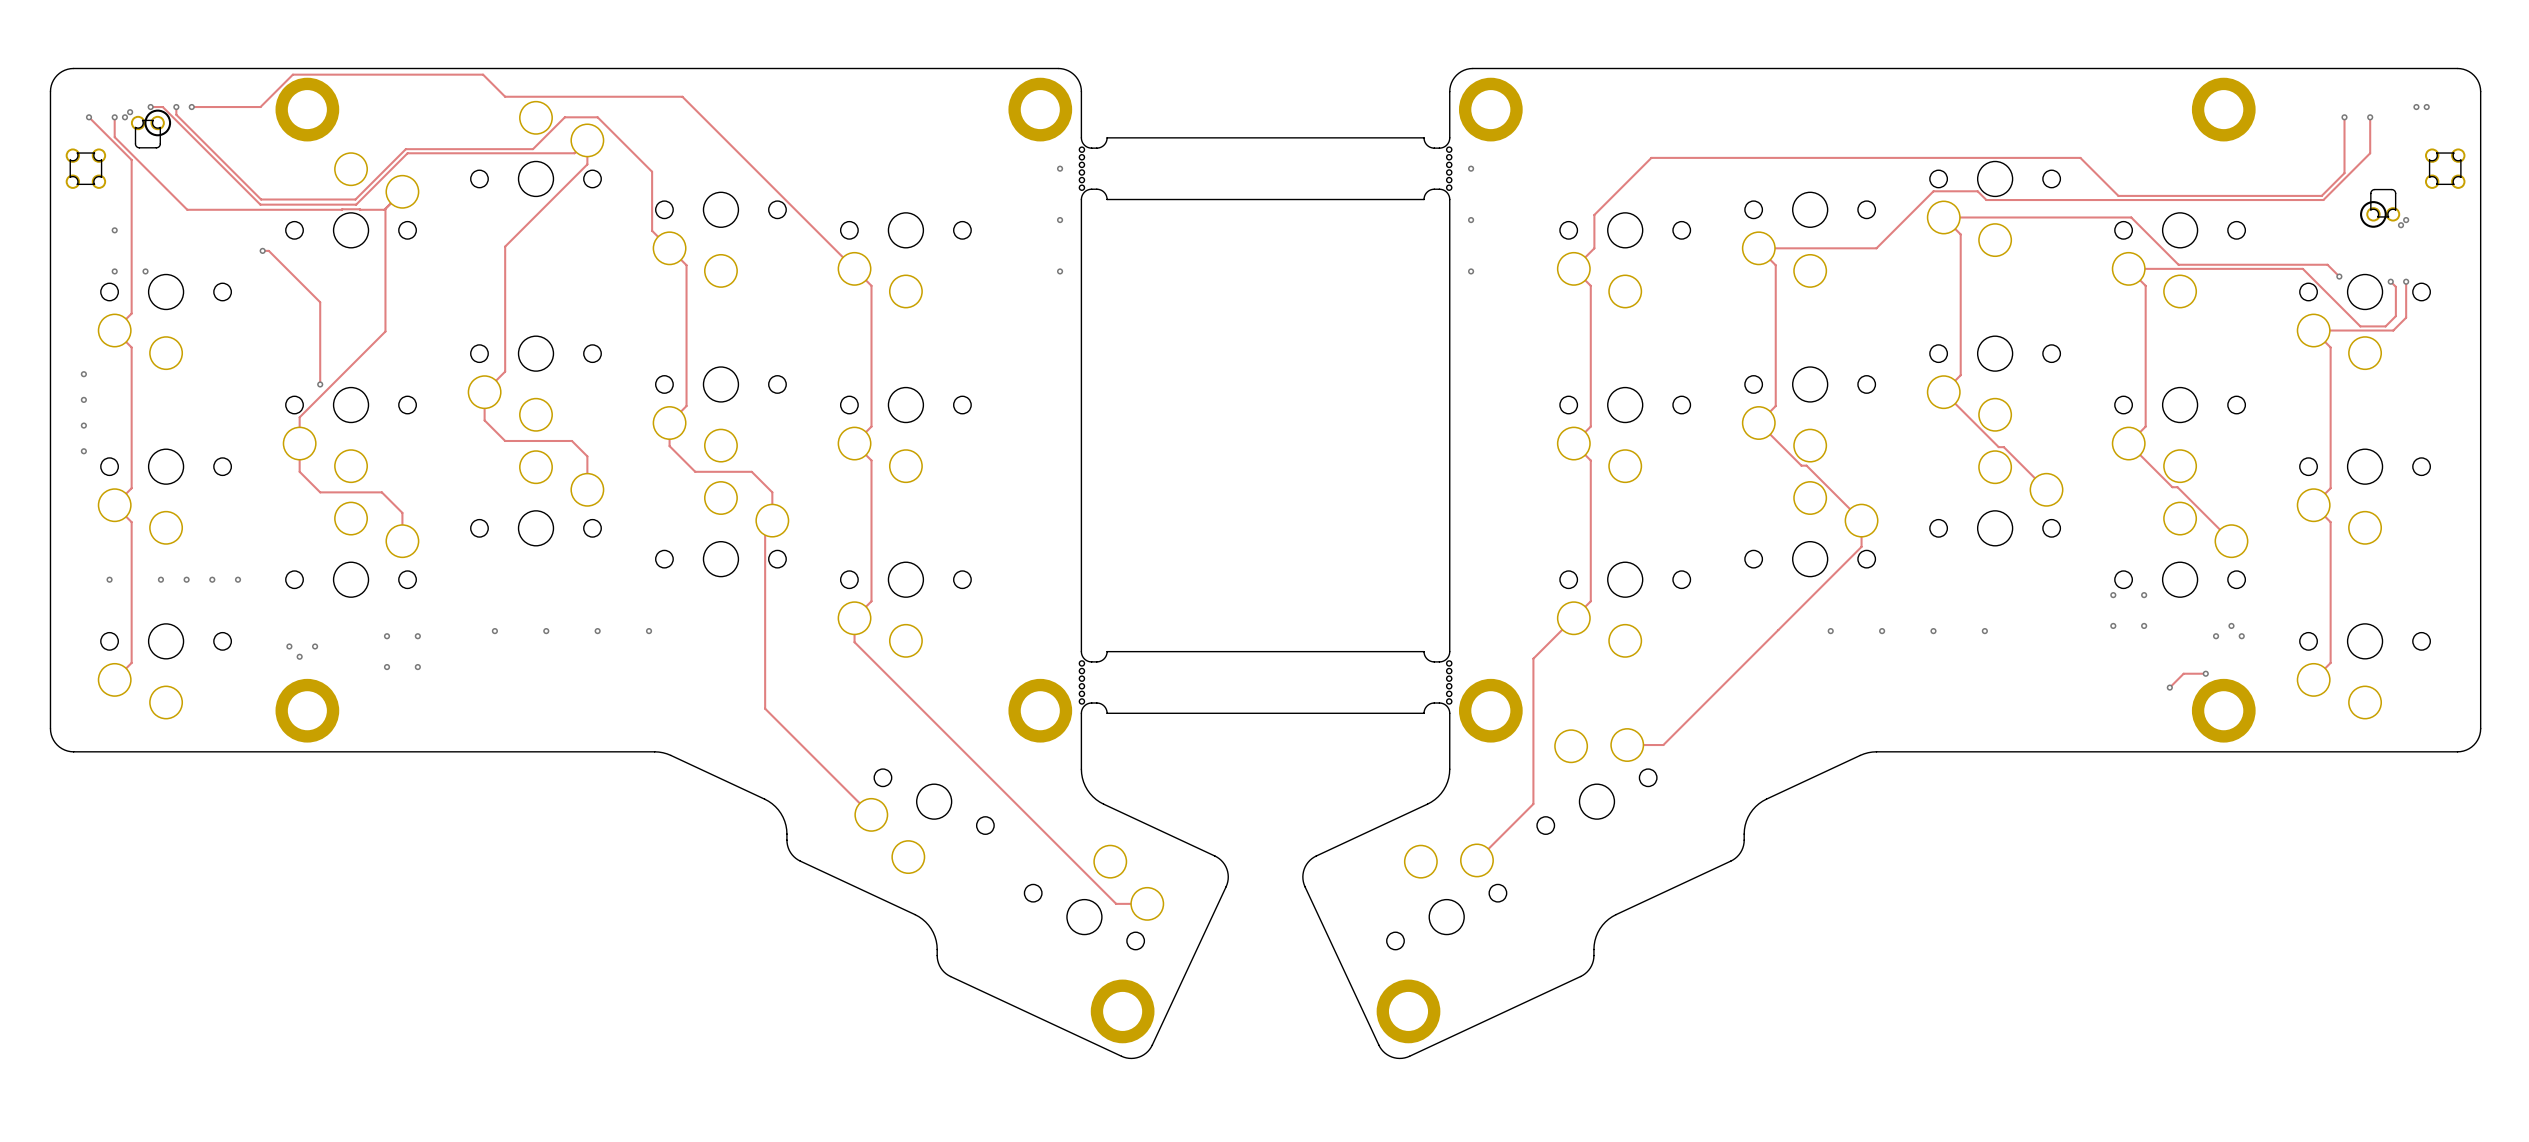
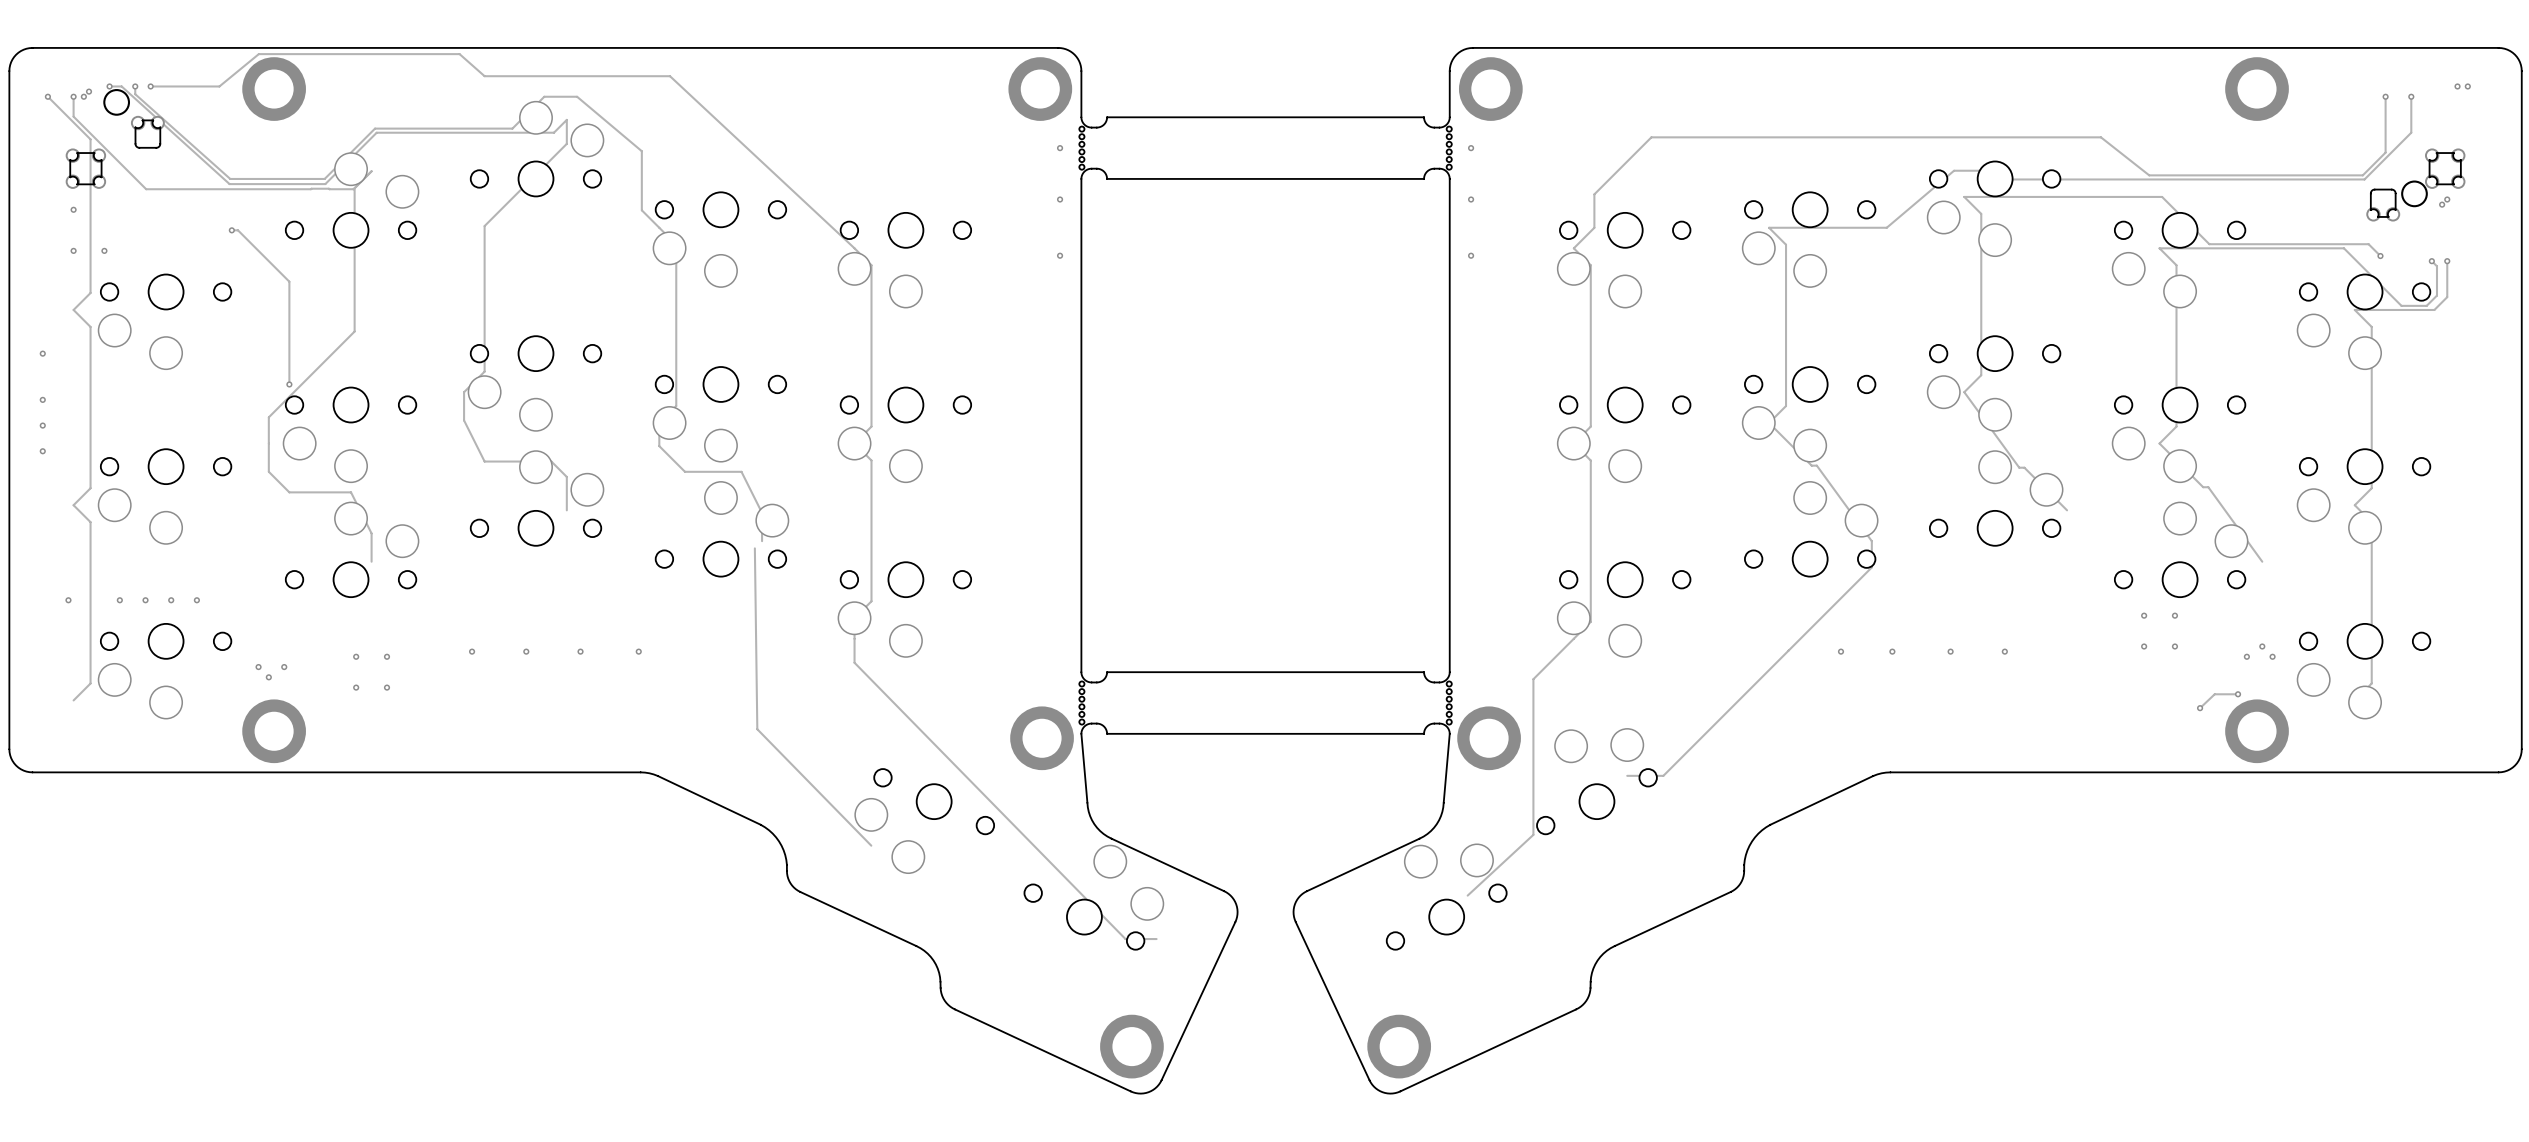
track: none -> (109, 86) (121, 86) (229, 184) (325, 184) (376, 132) (553, 132) (566, 119) (566, 143) (484, 226) (484, 371) (464, 392) (464, 420) (484, 461) (551, 461) (566, 476) (566, 510)
via: none -> (109, 86)
via: none -> (135, 86)
track: none -> (150, 86) (219, 86) (258, 54) (459, 54) (484, 76) (670, 76) (871, 265) (871, 285)
via: none -> (150, 86)
via: none -> (2457, 86)
via: none -> (2467, 86)
via: none -> (89, 91)
board edge: (1081, 91) (1079, 81) (1074, 75) (1068, 70) (1058, 68) (73, 68) (62, 71) (53, 80) (50, 91) (50, 728) (52, 737) (57, 745) (64, 750) (73, 751) (654, 751) (667, 753) (772, 803) (783, 817) (788, 847) (797, 859) (922, 919) (933, 932) (938, 963) (948, 975) (1121, 1056) (1134, 1058) (1145, 1053) (1152, 1045) (1226, 886) (1228, 874) (1224, 864) (1217, 857) (1103, 804) (1092, 796) (1085, 786) (1081, 773) (1081, 713) -> (1081, 91) (1081, 68) (1079, 61) (1070, 51) (1058, 47) (32, 47) (23, 49) (16, 54) (11, 62) (9, 71) (9, 749) (12, 760) (20, 769) (32, 772) (640, 772) (653, 774) (769, 830) (781, 845) (786, 859) (788, 878) (797, 890) (924, 950) (935, 964) (940, 977) (942, 995) (952, 1008) (1130, 1091) (1143, 1093) (1153, 1089) (1161, 1080) (1235, 921) (1237, 909) (1233, 899) (1226, 892) (1111, 838) (1097, 827) (1087, 807) (1081, 733)
board edge: (1449, 91) (1451, 82) (1456, 75) (1464, 70) (1472, 68) (2457, 68) (2469, 71) (2477, 80) (2480, 91) (2480, 728) (2478, 737) (2473, 745) (2466, 750) (2457, 751) (1876, 751) (1864, 753) (1759, 803) (1748, 817) (1742, 847) (1733, 859) (1608, 919) (1597, 932) (1592, 963) (1582, 975) (1409, 1056) (1396, 1058) (1387, 1054) (1378, 1045) (1305, 886) (1303, 874) (1306, 864) (1313, 857) (1427, 804) (1438, 796) (1445, 786) (1449, 773) (1449, 713) -> (1449, 91) (1449, 68) (1452, 59) (1461, 51) (1472, 47) (2498, 47) (2507, 49) (2514, 54) (2520, 62) (2521, 71) (2521, 749) (2518, 760) (2510, 769) (2498, 772) (1890, 772) (1877, 774) (1762, 830) (1749, 845) (1744, 859) (1742, 878) (1733, 890) (1606, 950) (1595, 964) (1591, 977) (1588, 995) (1578, 1008) (1400, 1091) (1387, 1093) (1375, 1088) (1369, 1080) (1295, 921) (1293, 909) (1297, 899) (1304, 892) (1419, 838) (1434, 827) (1443, 807) (1449, 733)
track: none -> (47, 96) (90, 139) (90, 293) (73, 309) (90, 326) (90, 488) (73, 505) (90, 522) (90, 683) (73, 700)
via: none -> (47, 96)
track: none -> (73, 96) (73, 116) (146, 189) (353, 189) (371, 171)
via: none -> (73, 96)
via: none -> (83, 96)
track: (544, 96) (505, 96) (483, 74) (292, 74) (260, 107) (191, 107) -> (544, 96) (512, 128) (375, 128) (324, 178) (230, 178) (135, 94) (135, 86)
track: (577, 96) (682, 96) (871, 285) -> (577, 96) (641, 151) (641, 210) (676, 244) (676, 406) (659, 423) (659, 446) (684, 471) (695, 471)
via: none -> (2385, 96)
track: none -> (2411, 96) (2411, 132) (2364, 179) (2006, 179) (1998, 170) (1954, 170) (1886, 227) (1769, 227) (1786, 244) (1786, 406) (1769, 423) (1811, 465) (1816, 465) (1871, 541) (1871, 567) (1663, 775) (1627, 775)
via: none -> (2411, 96)
track: (150, 107) (162, 107) (260, 204) (356, 204) (407, 153) (574, 153) (587, 140) (587, 164) (505, 246) (505, 371) (484, 392) (484, 420) (505, 440) (571, 440) (587, 456) (587, 489) -> none
via: (150, 107) -> none
track: (176, 107) (176, 114) (261, 199) (355, 199) (405, 149) (532, 149) (564, 117) (597, 117) (652, 171) (652, 230) (686, 265) (686, 406) (669, 423) (669, 446) (695, 471) -> none
via: (176, 107) -> none
via: (191, 107) -> none
via: (2416, 107) -> none
via: (2426, 107) -> none
part position: (307, 109) -> (274, 89)
part position: (1040, 109) -> (1040, 89)
part position: (1490, 109) -> (1490, 89)
part position: (2223, 109) -> (2257, 89)
via: (130, 112) -> none
track: (89, 117) (131, 159) (131, 313) (114, 330) (131, 347) (131, 488) (114, 505) (131, 522) (131, 662) (114, 679) -> none
via: (89, 117) -> none
track: (114, 117) (114, 137) (187, 209) (384, 209) (402, 191) -> none
via: (114, 117) -> none
via: (124, 117) -> none
board edge: (1081, 117) (1081, 137) -> (1081, 178) (1081, 199)
board edge: (1449, 117) (1449, 137) -> (1449, 178) (1449, 199)
track: (2344, 117) (2344, 173) (2321, 195) (2118, 195) (2080, 157) (1651, 157) (1594, 214) -> (2385, 96) (2385, 152) (2362, 175) (2149, 175) (2100, 137) (1651, 137) (1594, 194) (1594, 214)
via: (2344, 117) -> none
track: (2370, 117) (2370, 153) (2323, 200) (1986, 200) (1977, 191) (1933, 191) (1876, 248) (1758, 248) (1775, 265) (1775, 406) (1758, 423) (1801, 465) (1806, 465) (1861, 520) (1861, 546) (1663, 745) (1627, 745) -> none
via: (2370, 117) -> none
drawing position: (157, 122) -> (116, 102)
board edge: (1107, 137) (1424, 137) -> (1107, 117) (1424, 117)
via: none -> (1060, 148)
via: none -> (1471, 148)
via: (1060, 168) -> none
part position: (1093, 168) -> (1093, 148)
part position: (1437, 168) -> (1437, 148)
via: (1471, 168) -> none
via: none -> (1060, 199)
board edge: (1107, 199) (1424, 199) -> (1107, 178) (1424, 178)
via: none -> (1471, 199)
via: none -> (2447, 199)
via: none -> (2442, 204)
track: (385, 208) (385, 331) (299, 417) (299, 471) (320, 492) -> (354, 188) (354, 331) (268, 417) (268, 471) (289, 492) (320, 492)
via: none -> (73, 209)
drawing position: (2373, 214) -> (2414, 193)
via: (1060, 220) -> none
via: (1471, 220) -> none
via: (2406, 220) -> none
via: (2401, 225) -> none
track: (1594, 227) (1594, 248) (1573, 268) (1590, 285) -> (1594, 227) (1573, 248) (1590, 265) (1590, 285)
via: (114, 230) -> none
track: none -> (231, 230) (238, 230) (289, 281) (289, 384)
via: none -> (73, 250)
via: none -> (104, 250)
track: (262, 250) (268, 250) (320, 302) (320, 384) -> none
via position: (262, 250) -> (231, 230)
via: none -> (2380, 256)
track: none -> (2431, 261) (2436, 266) (2436, 295) (2426, 305) (2401, 305) (2343, 248) (2159, 248) (2176, 265) (2176, 426) (2159, 443) (2203, 487) (2208, 487) (2262, 561)
via: none -> (2431, 261)
track: none -> (2447, 261) (2447, 297) (2434, 309) (2354, 309) (2371, 326) (2371, 488) (2354, 505) (2371, 522) (2371, 683) (2354, 700)
via: none -> (2447, 261)
via: (114, 271) -> none
via: (145, 271) -> none
via position: (1060, 271) -> (1060, 255)
via position: (1471, 271) -> (1471, 255)
track: (2339, 276) (2327, 264) (2178, 264) (2131, 217) (1943, 217) (1960, 234) (1960, 375) (1943, 392) (1998, 447) (2003, 447) (2024, 467) -> (2380, 256) (2368, 244) (2209, 244) (2162, 196) (1964, 196) (1981, 213) (1981, 375) (1964, 392) (2019, 467) (2024, 467)
via: (2339, 276) -> none
track: (2390, 281) (2395, 286) (2395, 316) (2385, 326) (2360, 326) (2302, 268) (2128, 268) (2145, 285) (2145, 426) (2128, 443) (2172, 487) (2177, 487) (2231, 541) -> none
via: (2390, 281) -> none
track: (2406, 281) (2406, 317) (2393, 330) (2313, 330) (2330, 347) (2330, 488) (2313, 505) (2330, 522) (2330, 662) (2313, 679) -> none
via: (2406, 281) -> none
via: none -> (42, 353)
via: (83, 374) -> none
via position: (320, 384) -> (289, 384)
via: none -> (42, 399)
via: (83, 399) -> none
via: none -> (42, 425)
via: (83, 425) -> none
via: none -> (42, 451)
via: (83, 451) -> none
track: (741, 471) (751, 471) (772, 492) (772, 520) -> (741, 471) (762, 512) (762, 541)
track: none -> (2046, 489) (2067, 510)
track: (351, 492) (381, 492) (402, 512) (402, 541) -> (351, 492) (371, 533) (371, 561)
track: (765, 527) (765, 708) (871, 814) -> none
track: none -> (754, 548) (757, 729) (871, 845)
via: (109, 579) -> none
via: (160, 579) -> none
via: (186, 579) -> none
via: (212, 579) -> none
via: (238, 579) -> none
via: (2113, 595) -> none
via: (2144, 595) -> none
via: none -> (68, 600)
via: none -> (119, 600)
via: none -> (145, 600)
via: none -> (171, 600)
via: none -> (196, 600)
track: (1590, 601) (1533, 658) (1533, 679) -> (1590, 601) (1590, 621) (1533, 679)
via: none -> (2144, 615)
via: none -> (2174, 615)
via: (2113, 625) -> none
via: (2144, 625) -> none
via: (2231, 625) -> none
via: (494, 631) -> none
via: (546, 631) -> none
via: (597, 631) -> none
via: (649, 631) -> none
via: (1830, 631) -> none
via: (1882, 631) -> none
via: (1933, 631) -> none
via: (1984, 631) -> none
via: (387, 636) -> none
via: (417, 636) -> none
via: (2216, 636) -> none
via: (2241, 636) -> none
track: (854, 642) (1116, 903) (1147, 903) -> (854, 642) (854, 662) (1125, 939) (1156, 939)
via: (289, 646) -> none
via: (315, 646) -> none
via: none -> (2144, 646)
via: none -> (2174, 646)
via: none -> (2262, 646)
via: none -> (472, 651)
via: none -> (526, 651)
via: none -> (580, 651)
via: none -> (638, 651)
board edge: none -> (1081, 651) (1081, 672)
board edge: (1107, 651) (1424, 651) -> (1107, 672) (1424, 672)
board edge: none -> (1449, 651) (1449, 672)
via: none -> (1841, 651)
via: none -> (1892, 651)
via: none -> (1950, 651)
via: none -> (2004, 651)
via: (299, 656) -> none
via: none -> (356, 656)
via: none -> (387, 656)
via: none -> (2246, 656)
via: none -> (2272, 656)
via: none -> (258, 667)
via: none -> (284, 667)
via: (387, 667) -> none
via: (417, 667) -> none
track: (2205, 673) (2183, 673) (2169, 687) -> none
via: (2205, 673) -> none
via: none -> (268, 677)
part position: (1093, 682) -> (1093, 703)
part position: (1437, 682) -> (1437, 703)
via: none -> (356, 687)
via: none -> (387, 687)
via: (2169, 687) -> none
track: none -> (2238, 694) (2214, 694) (2200, 708)
via: none -> (2238, 694)
via: none -> (2200, 708)
part position: (307, 710) -> (274, 731)
part position: (1040, 710) -> (1042, 738)
part position: (1490, 710) -> (1489, 738)
part position: (2223, 710) -> (2257, 731)
board edge: (1107, 713) (1424, 713) -> (1107, 733) (1424, 733)
track: (1533, 804) (1476, 860) -> (1533, 804) (1533, 834) (1467, 895)
part position: (1122, 1011) -> (1131, 1046)
part position: (1408, 1011) -> (1399, 1046)

